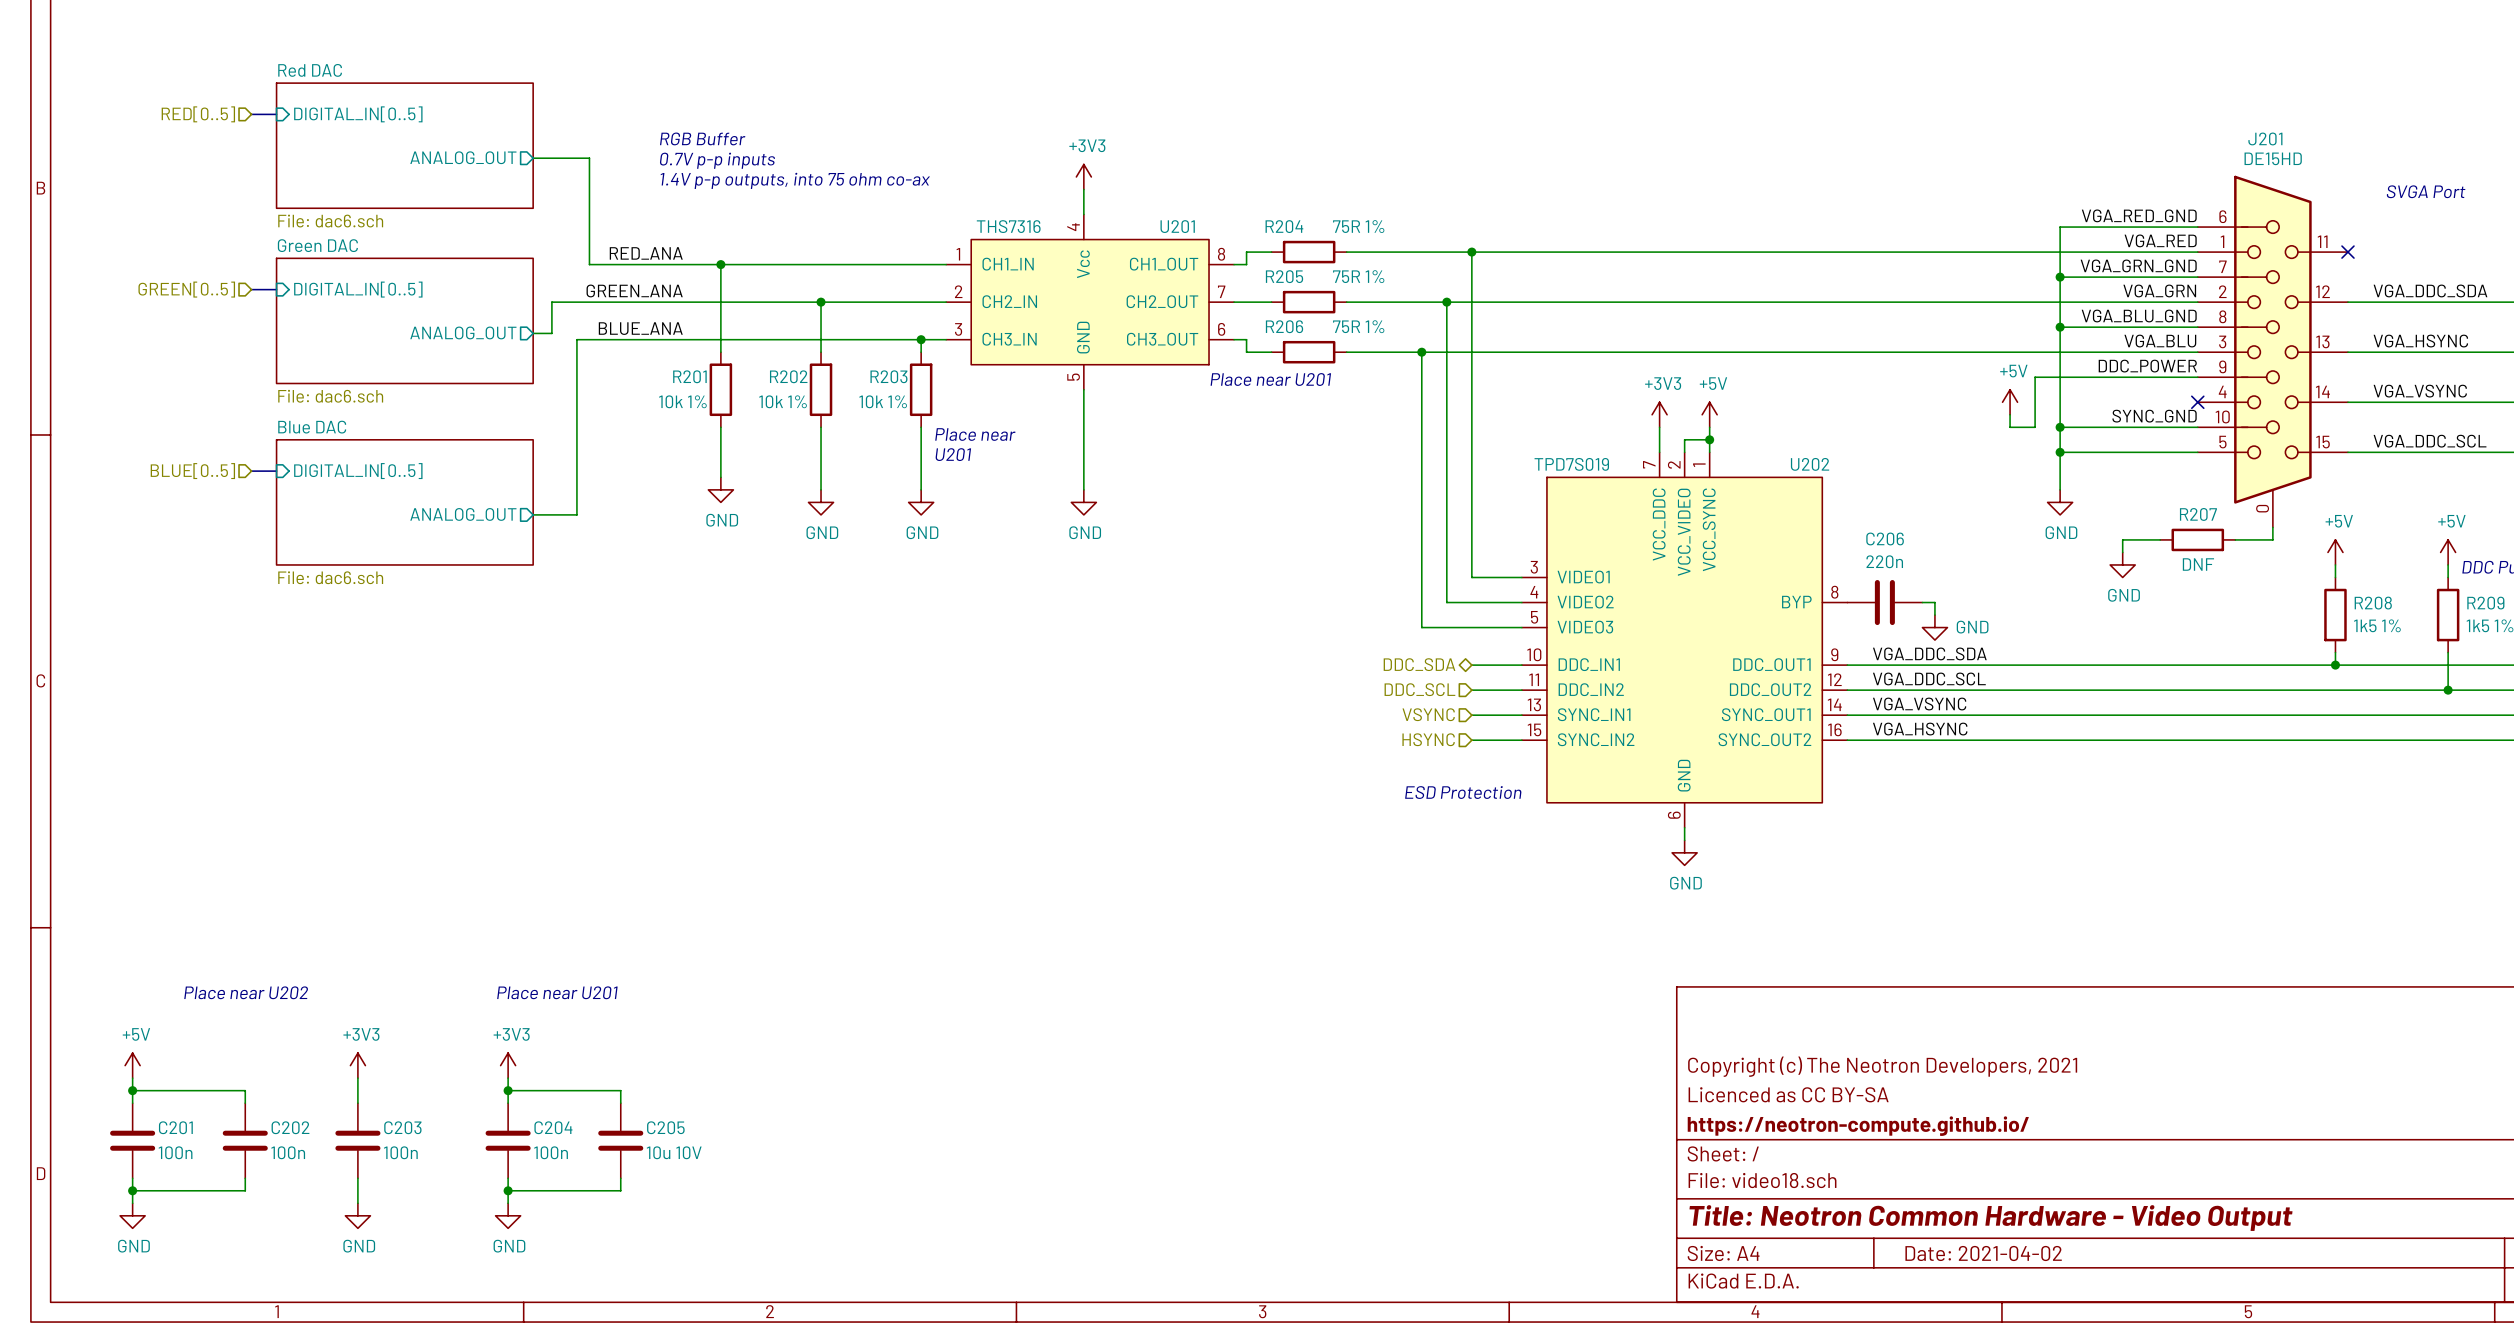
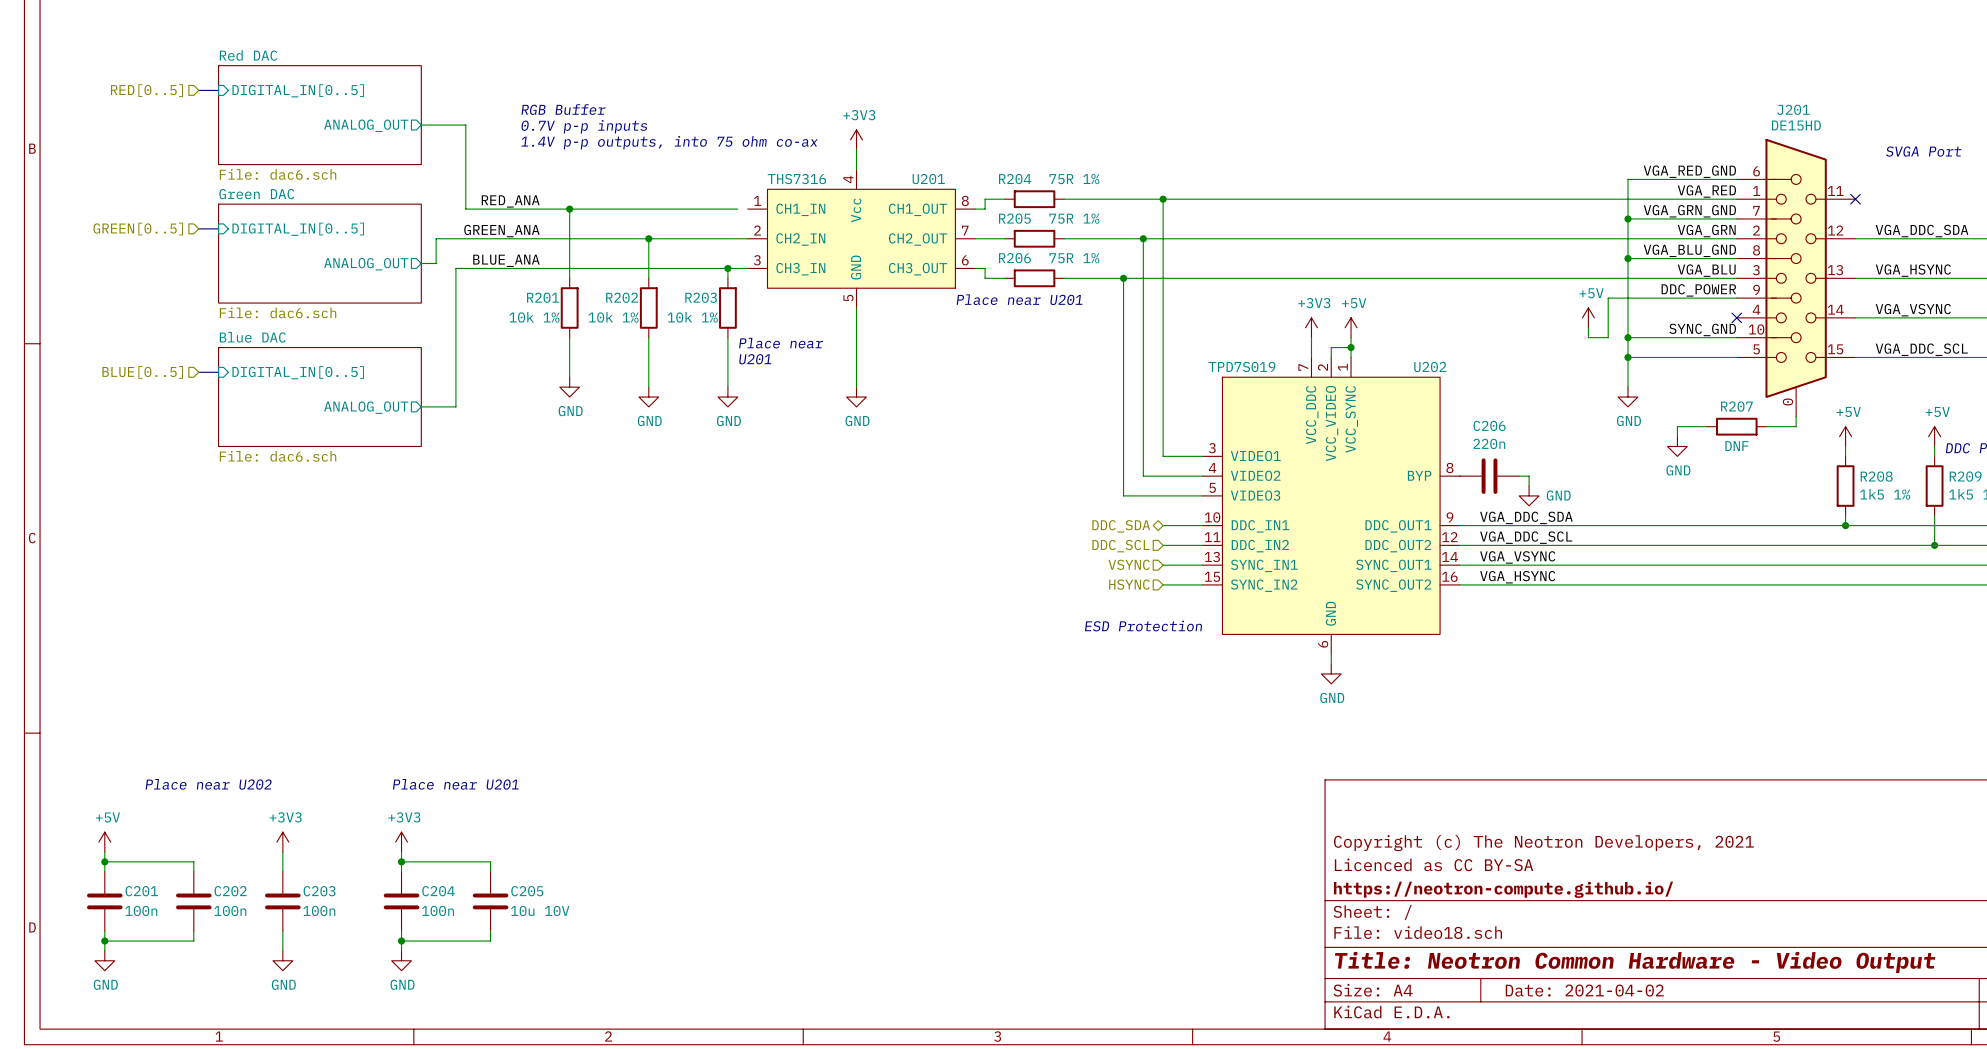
wire: (933, 264) (946, 264) -> none

